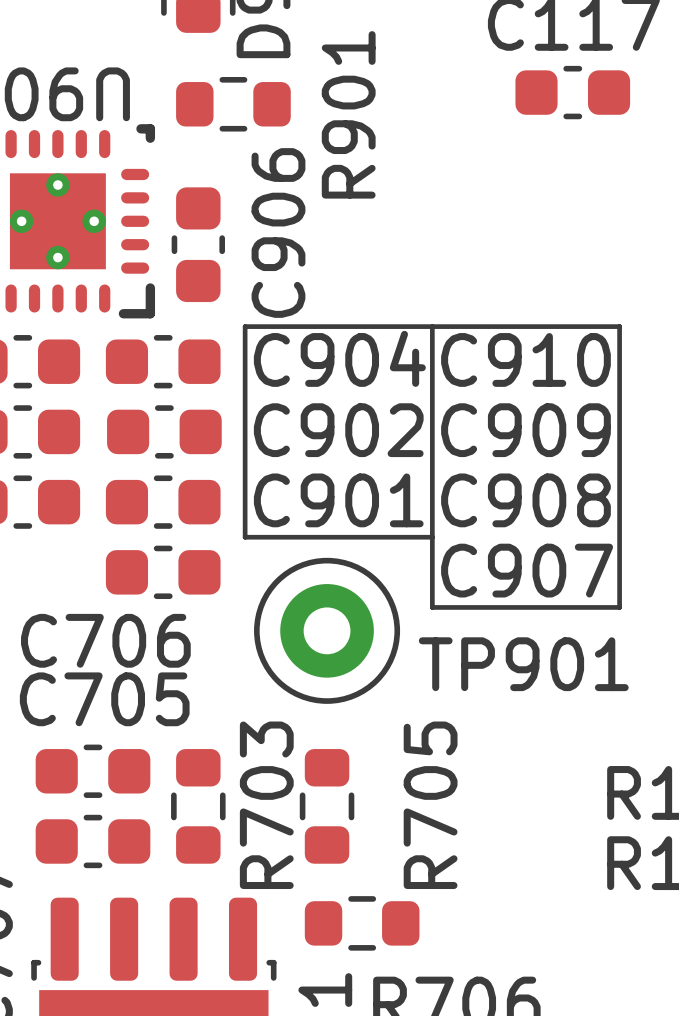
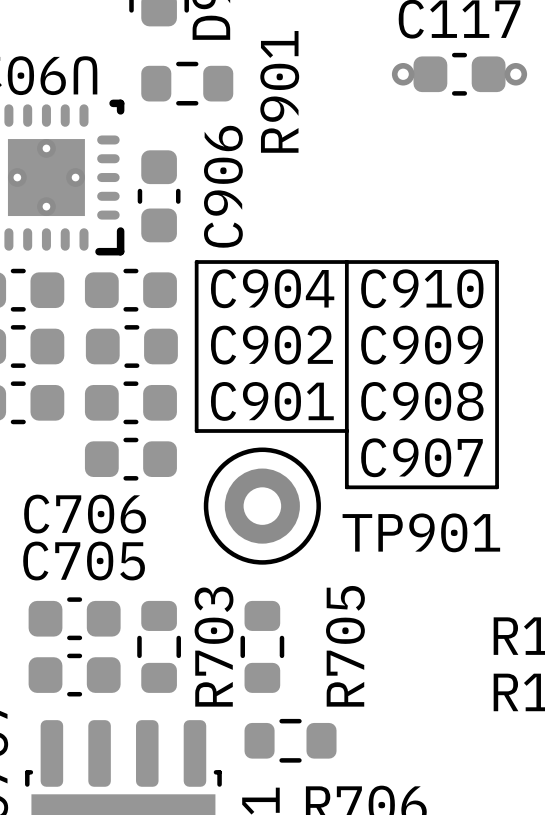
via: none -> (403, 74)
via: none -> (515, 74)

